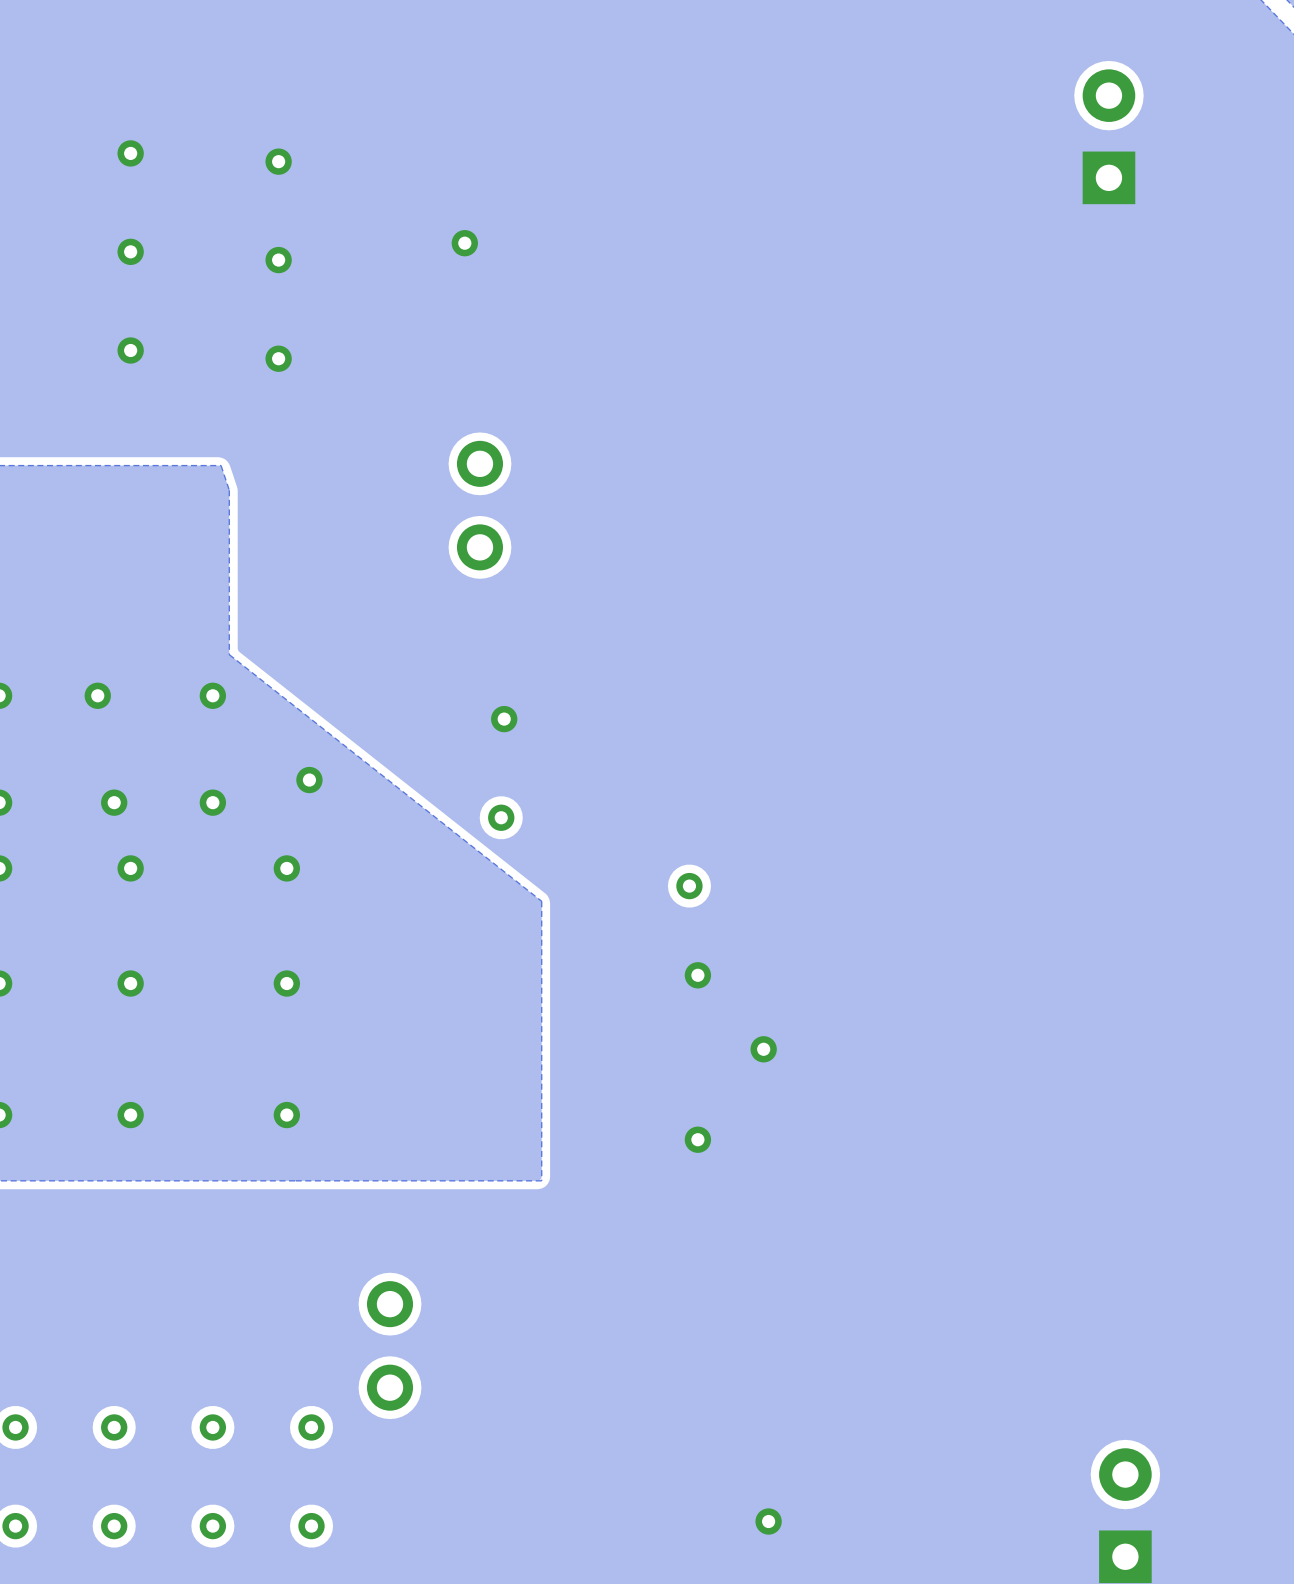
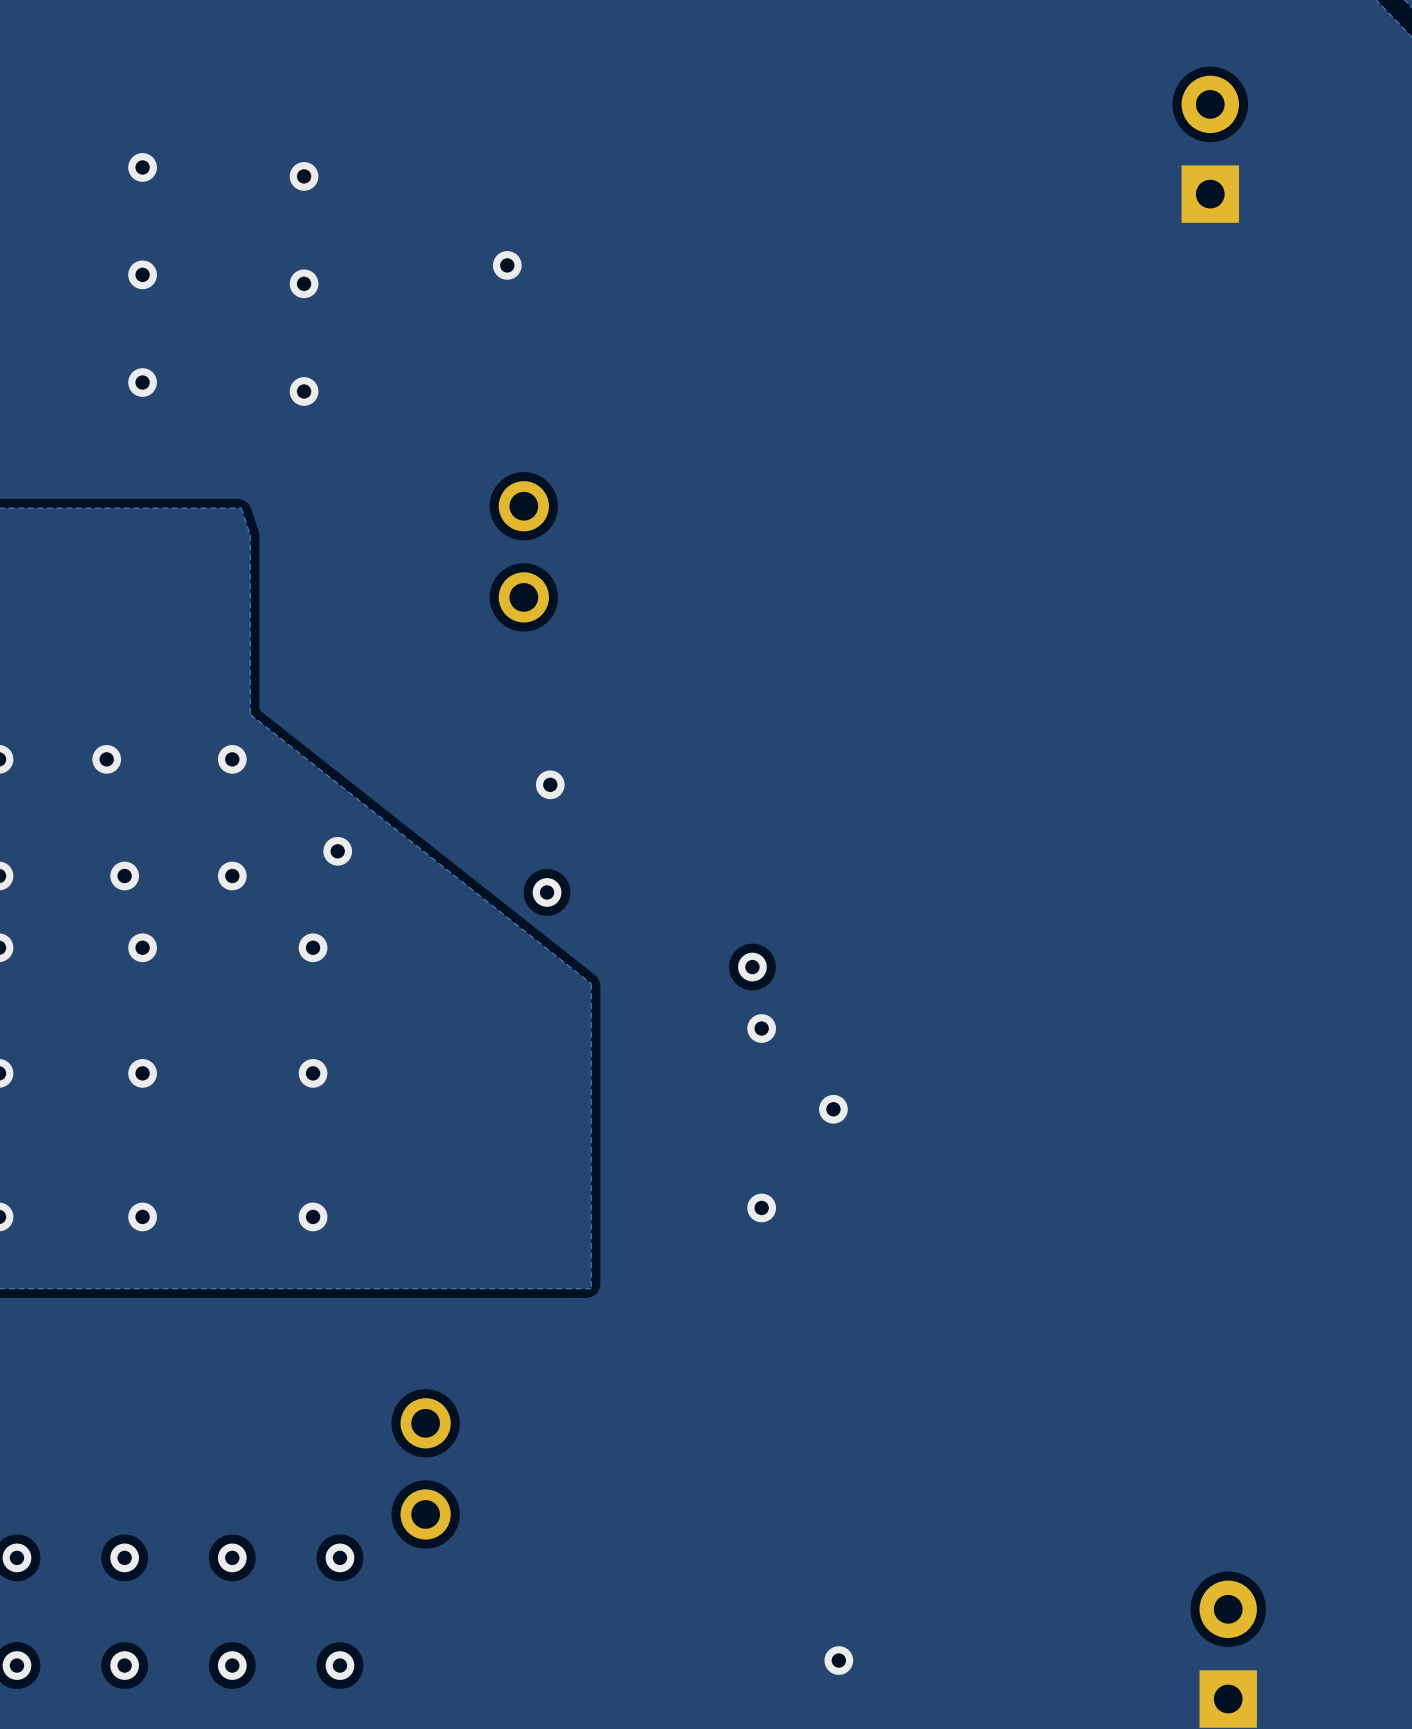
via position: (697, 975) -> (761, 1028)
via position: (763, 1049) -> (833, 1109)
via position: (697, 1139) -> (761, 1207)

